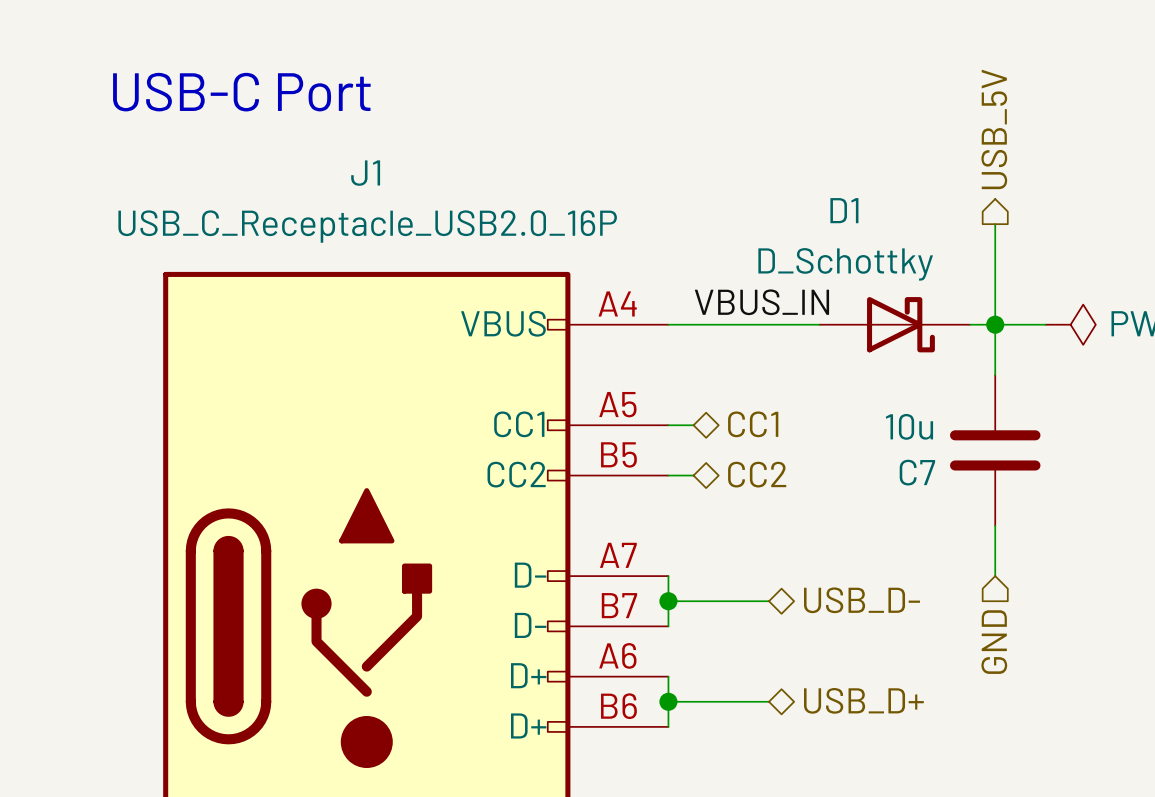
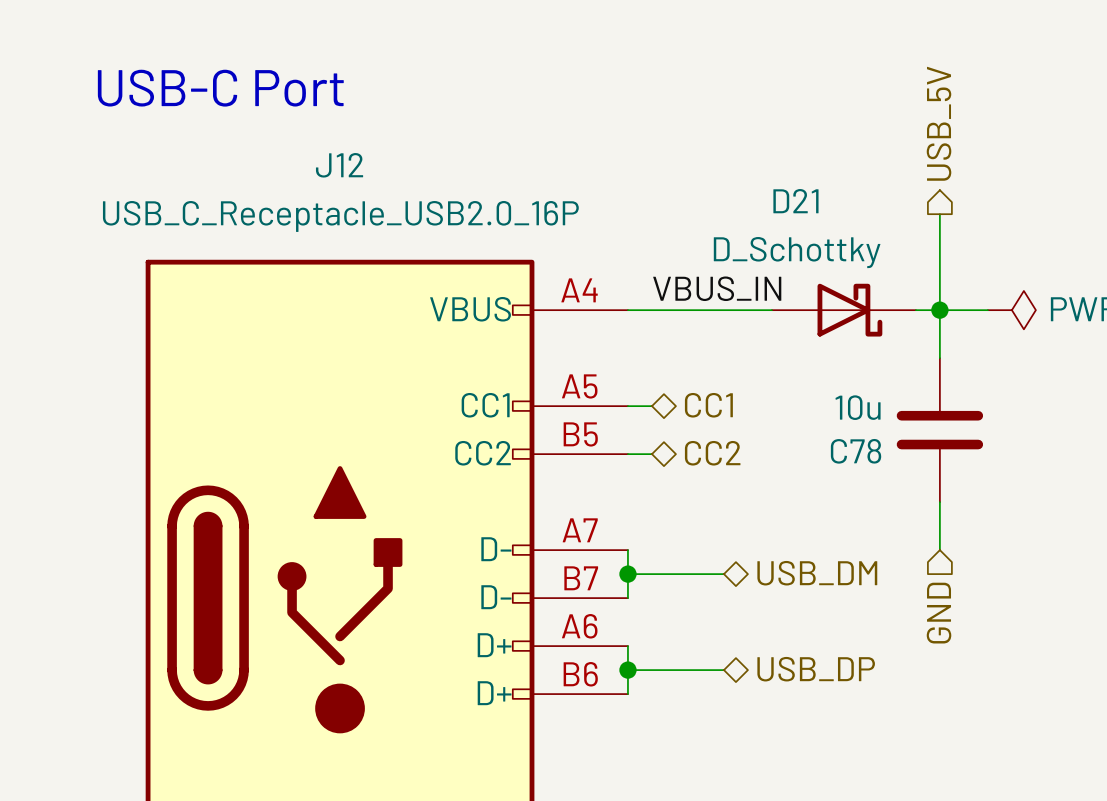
J1 name: J1 (365, 173) -> J12 (339, 165)
D1 name: D1 (844, 210) -> D21 (795, 201)
C7 name: C7 (917, 472) -> C78 (856, 451)
hierarchical label: USB_D- (862, 600) -> USB_DM (817, 573)
hierarchical label: USB_D+ (863, 700) -> USB_DP (816, 669)

